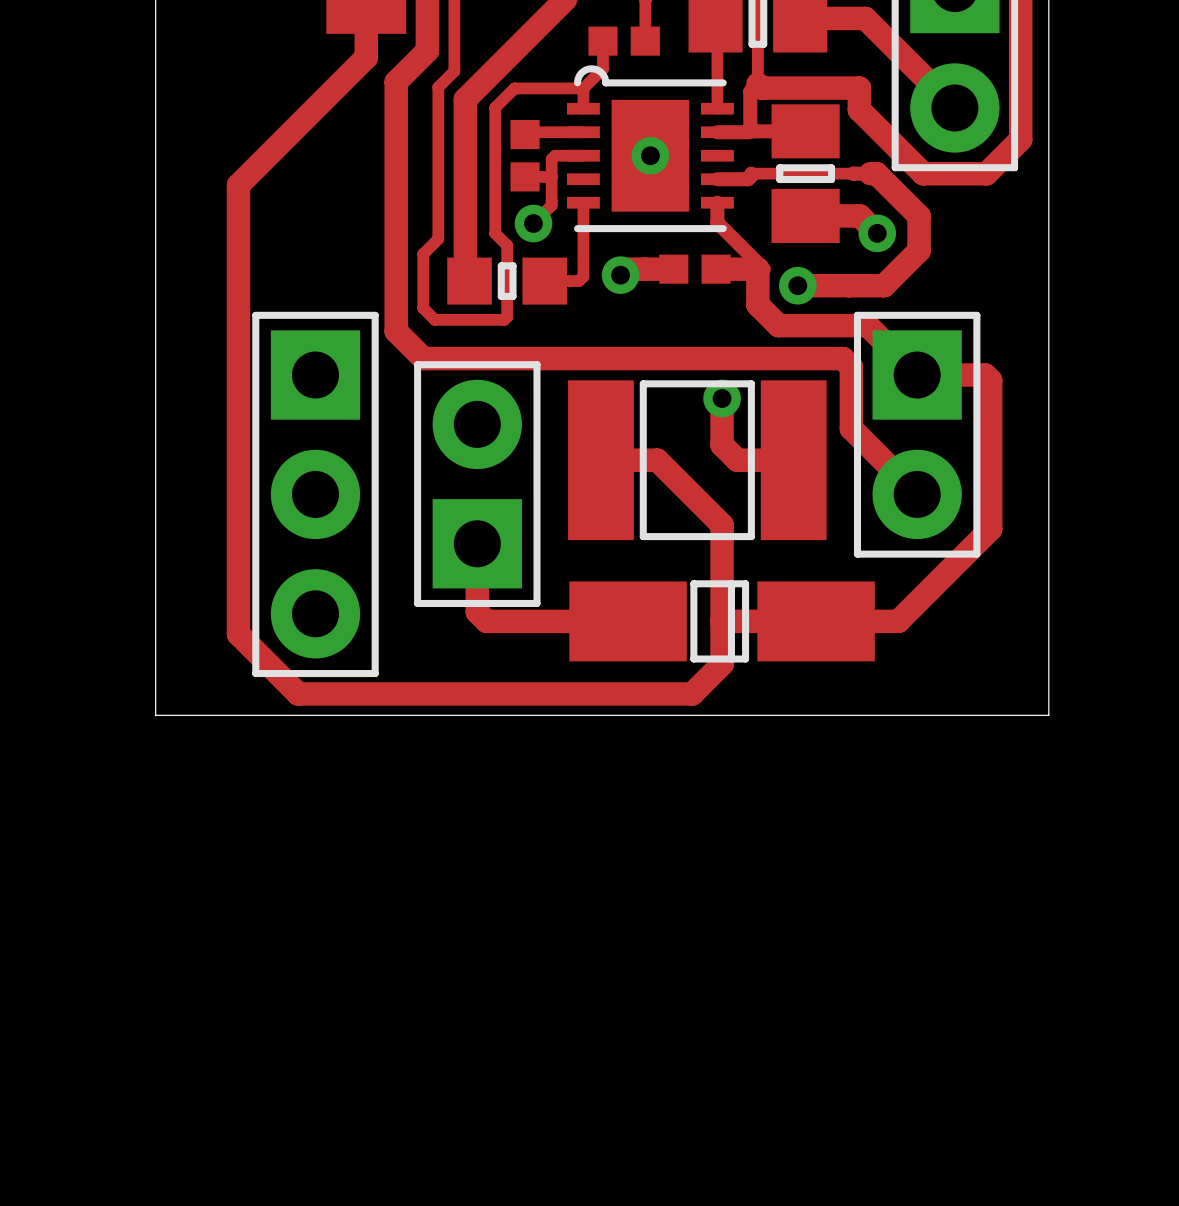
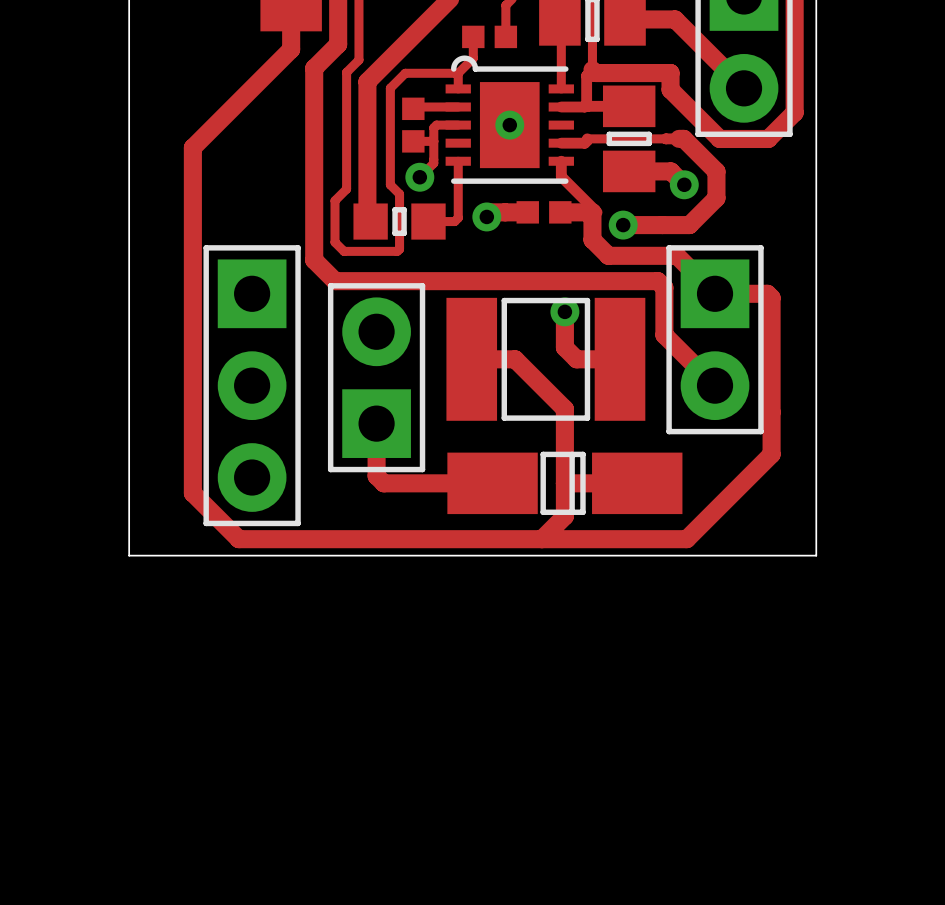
track: (990, 529) (898, 621) (816, 621) -> (771, 412) (771, 454) (686, 539) (541, 539)

